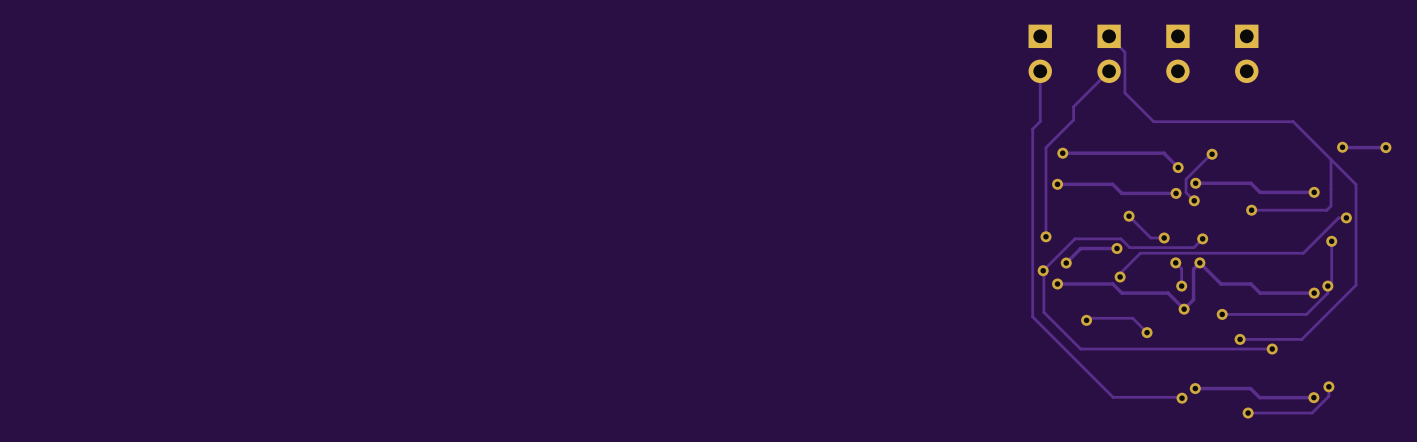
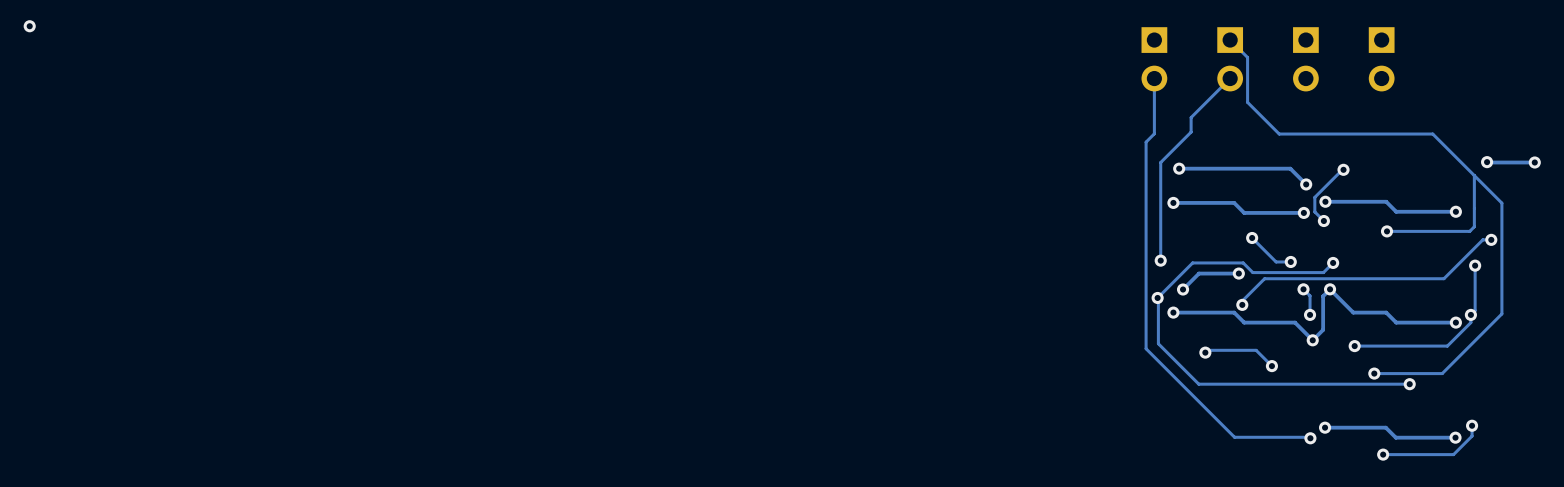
via: none -> (29, 26)

